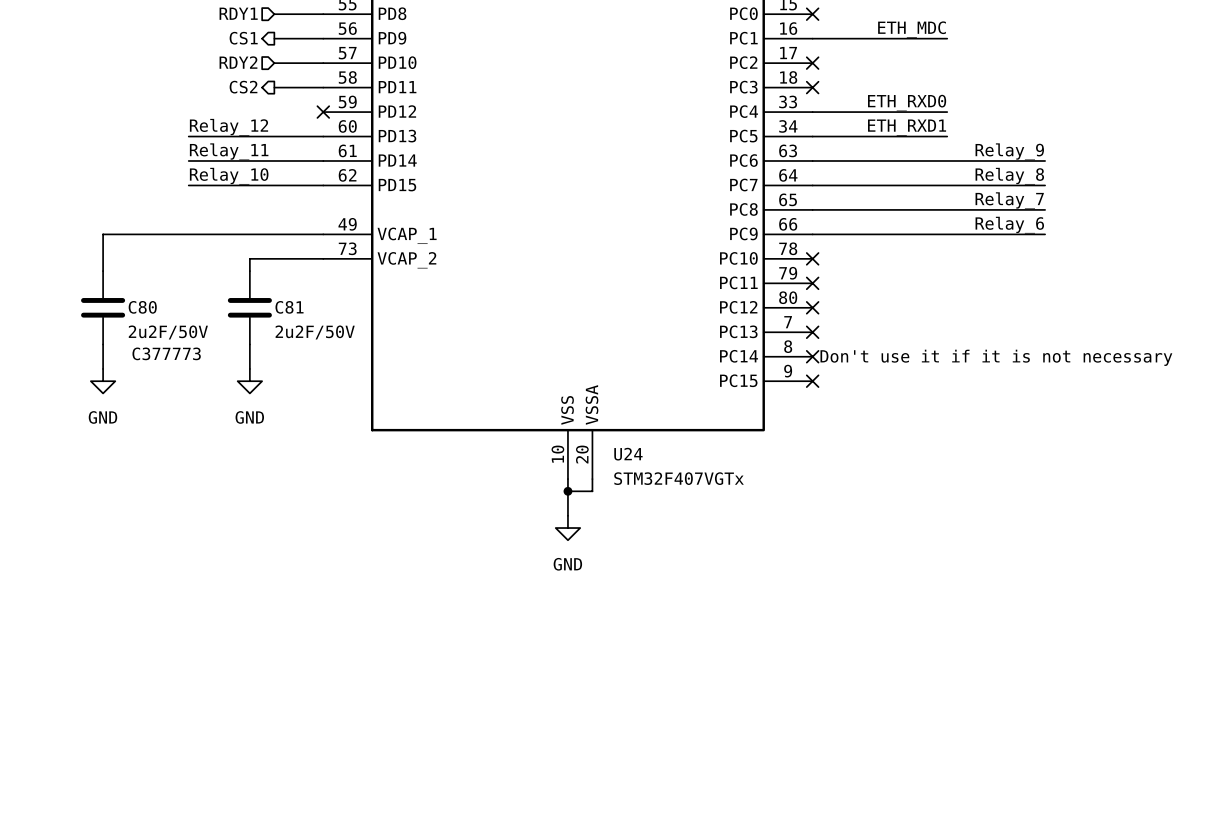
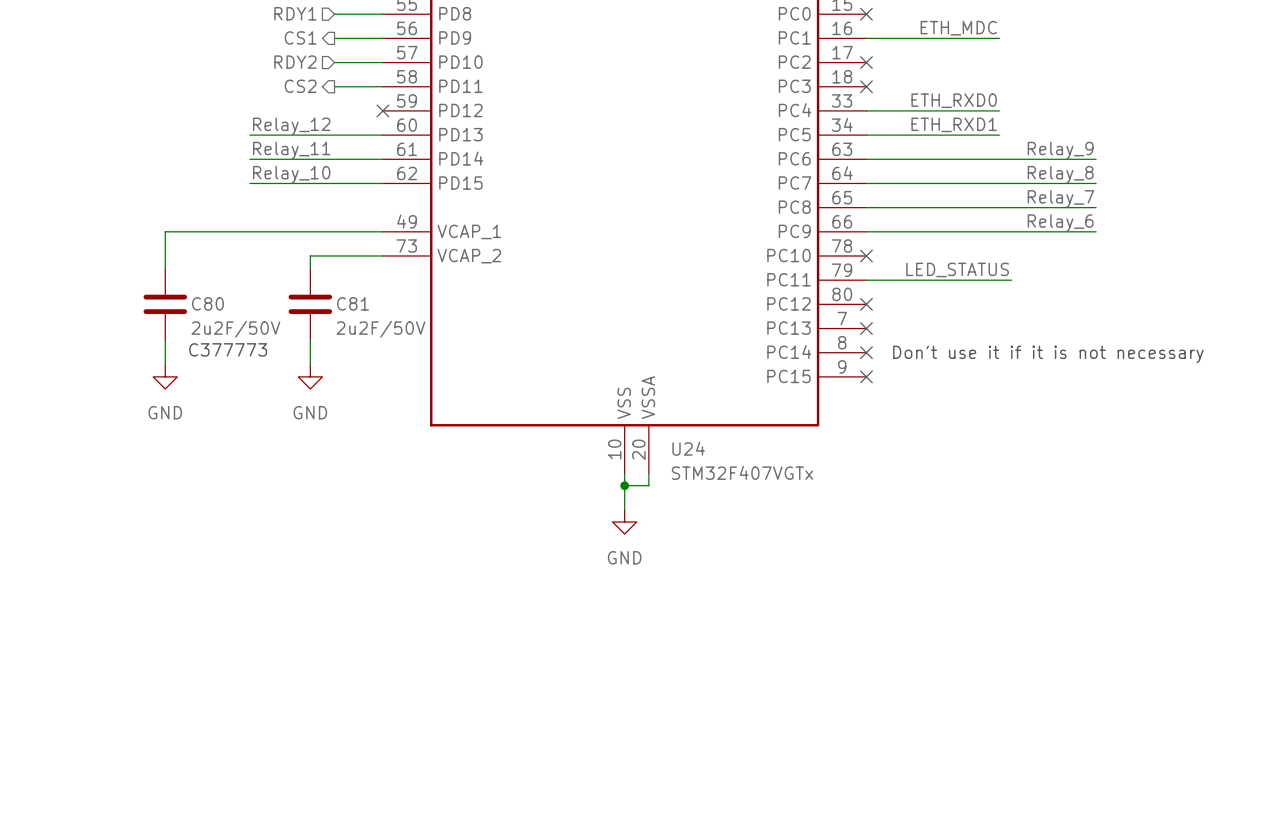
label: none -> LED_STATUS (957, 269)
wire: none -> (866, 280) (1011, 280)
no-connect mark: (812, 283) -> none

